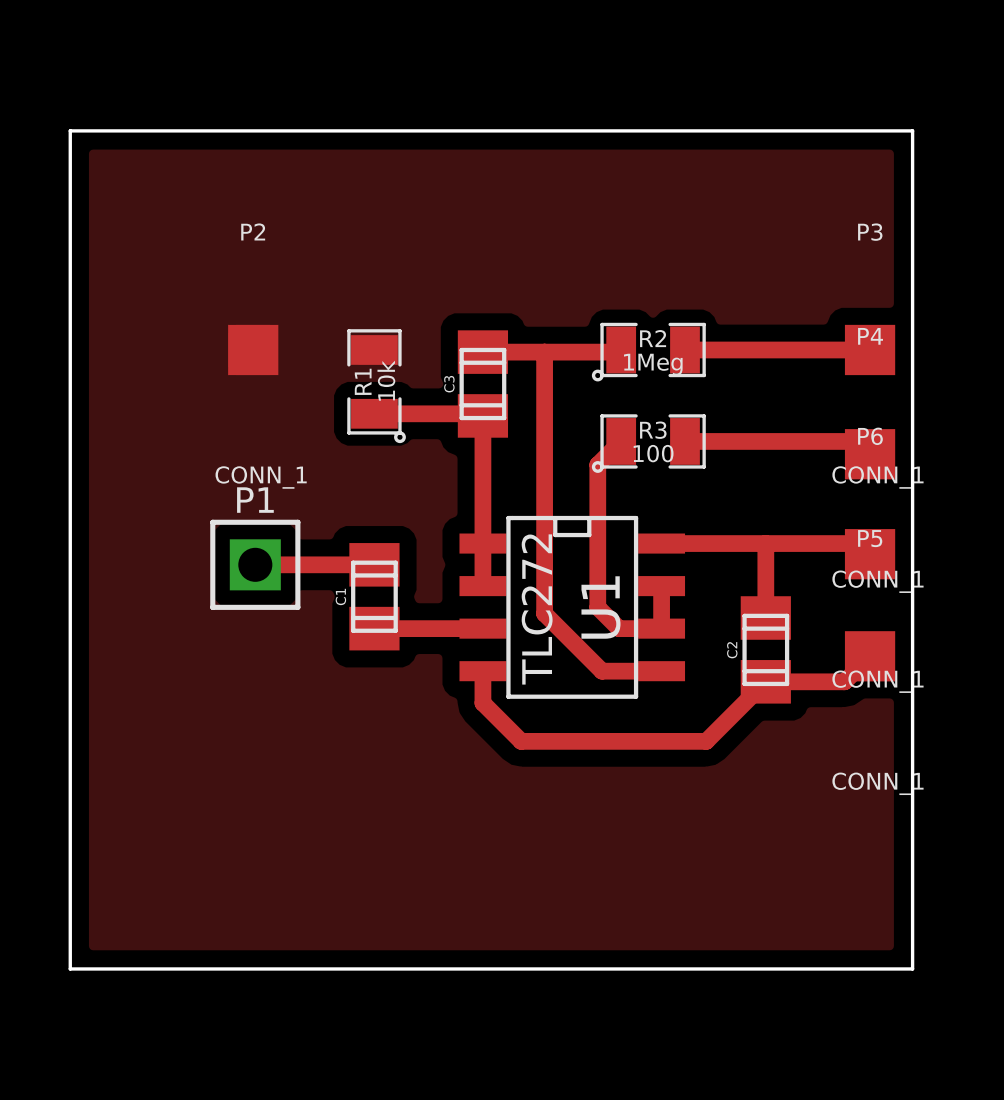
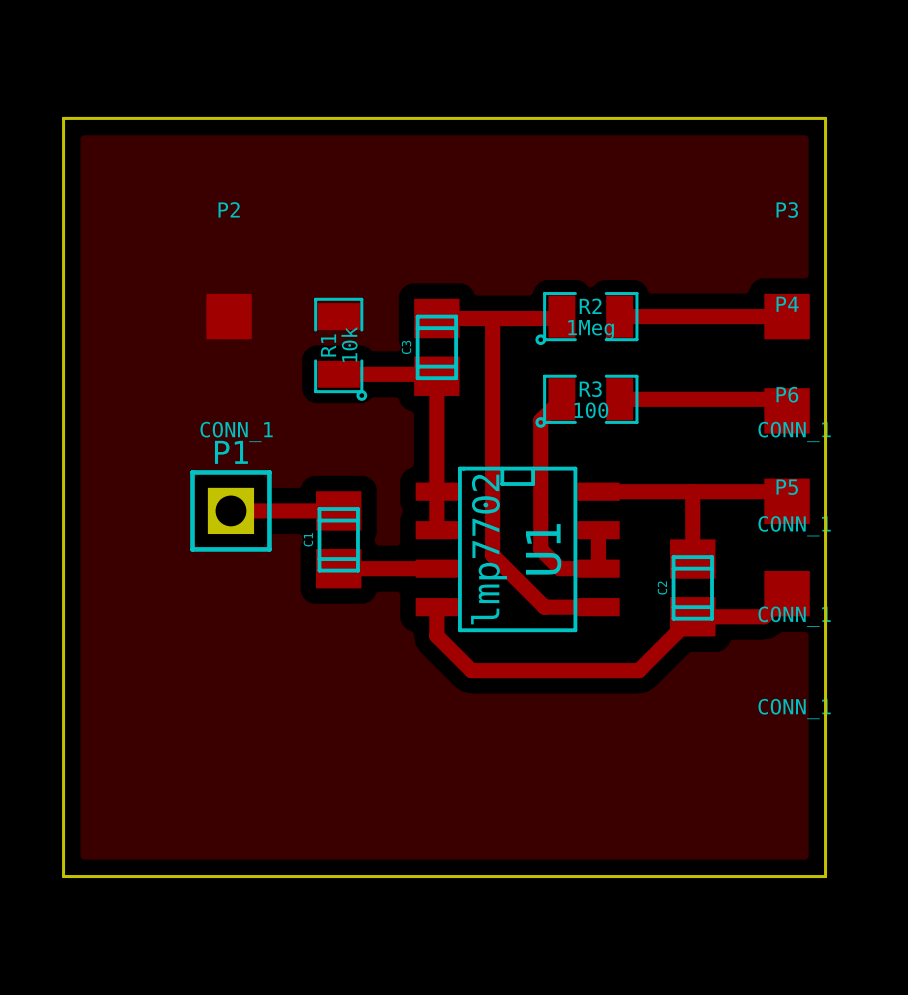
U1 value: TLC272 (537, 609) -> lmp7702 (489, 549)

